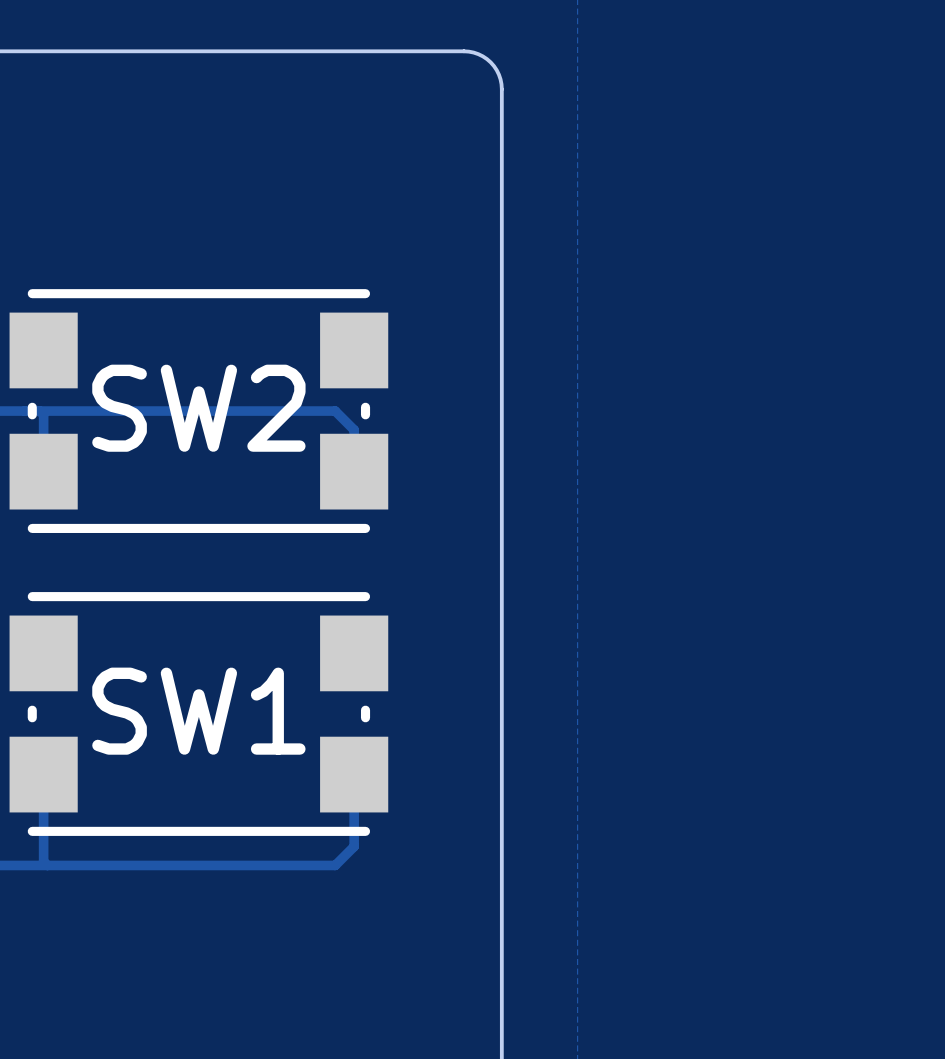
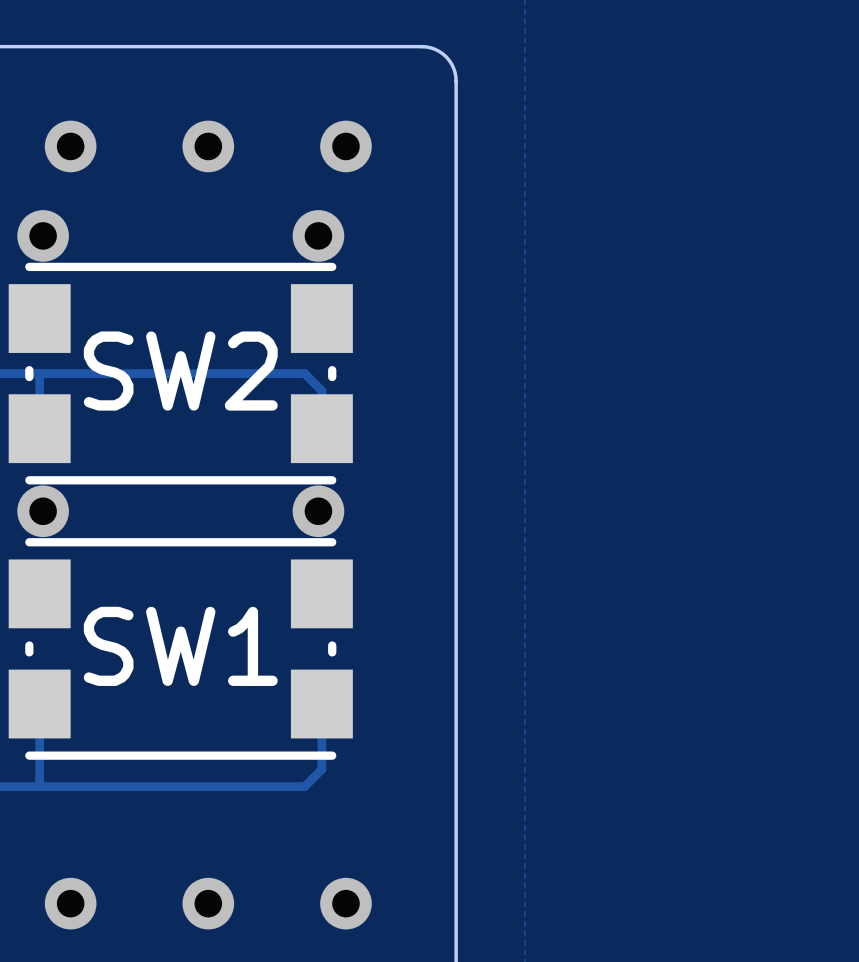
via: none -> (70, 146)
via: none -> (208, 146)
via: none -> (345, 146)
via: none -> (43, 235)
via: none -> (318, 235)
via: none -> (43, 511)
via: none -> (318, 511)
via: none -> (70, 903)
via: none -> (208, 903)
via: none -> (345, 903)

